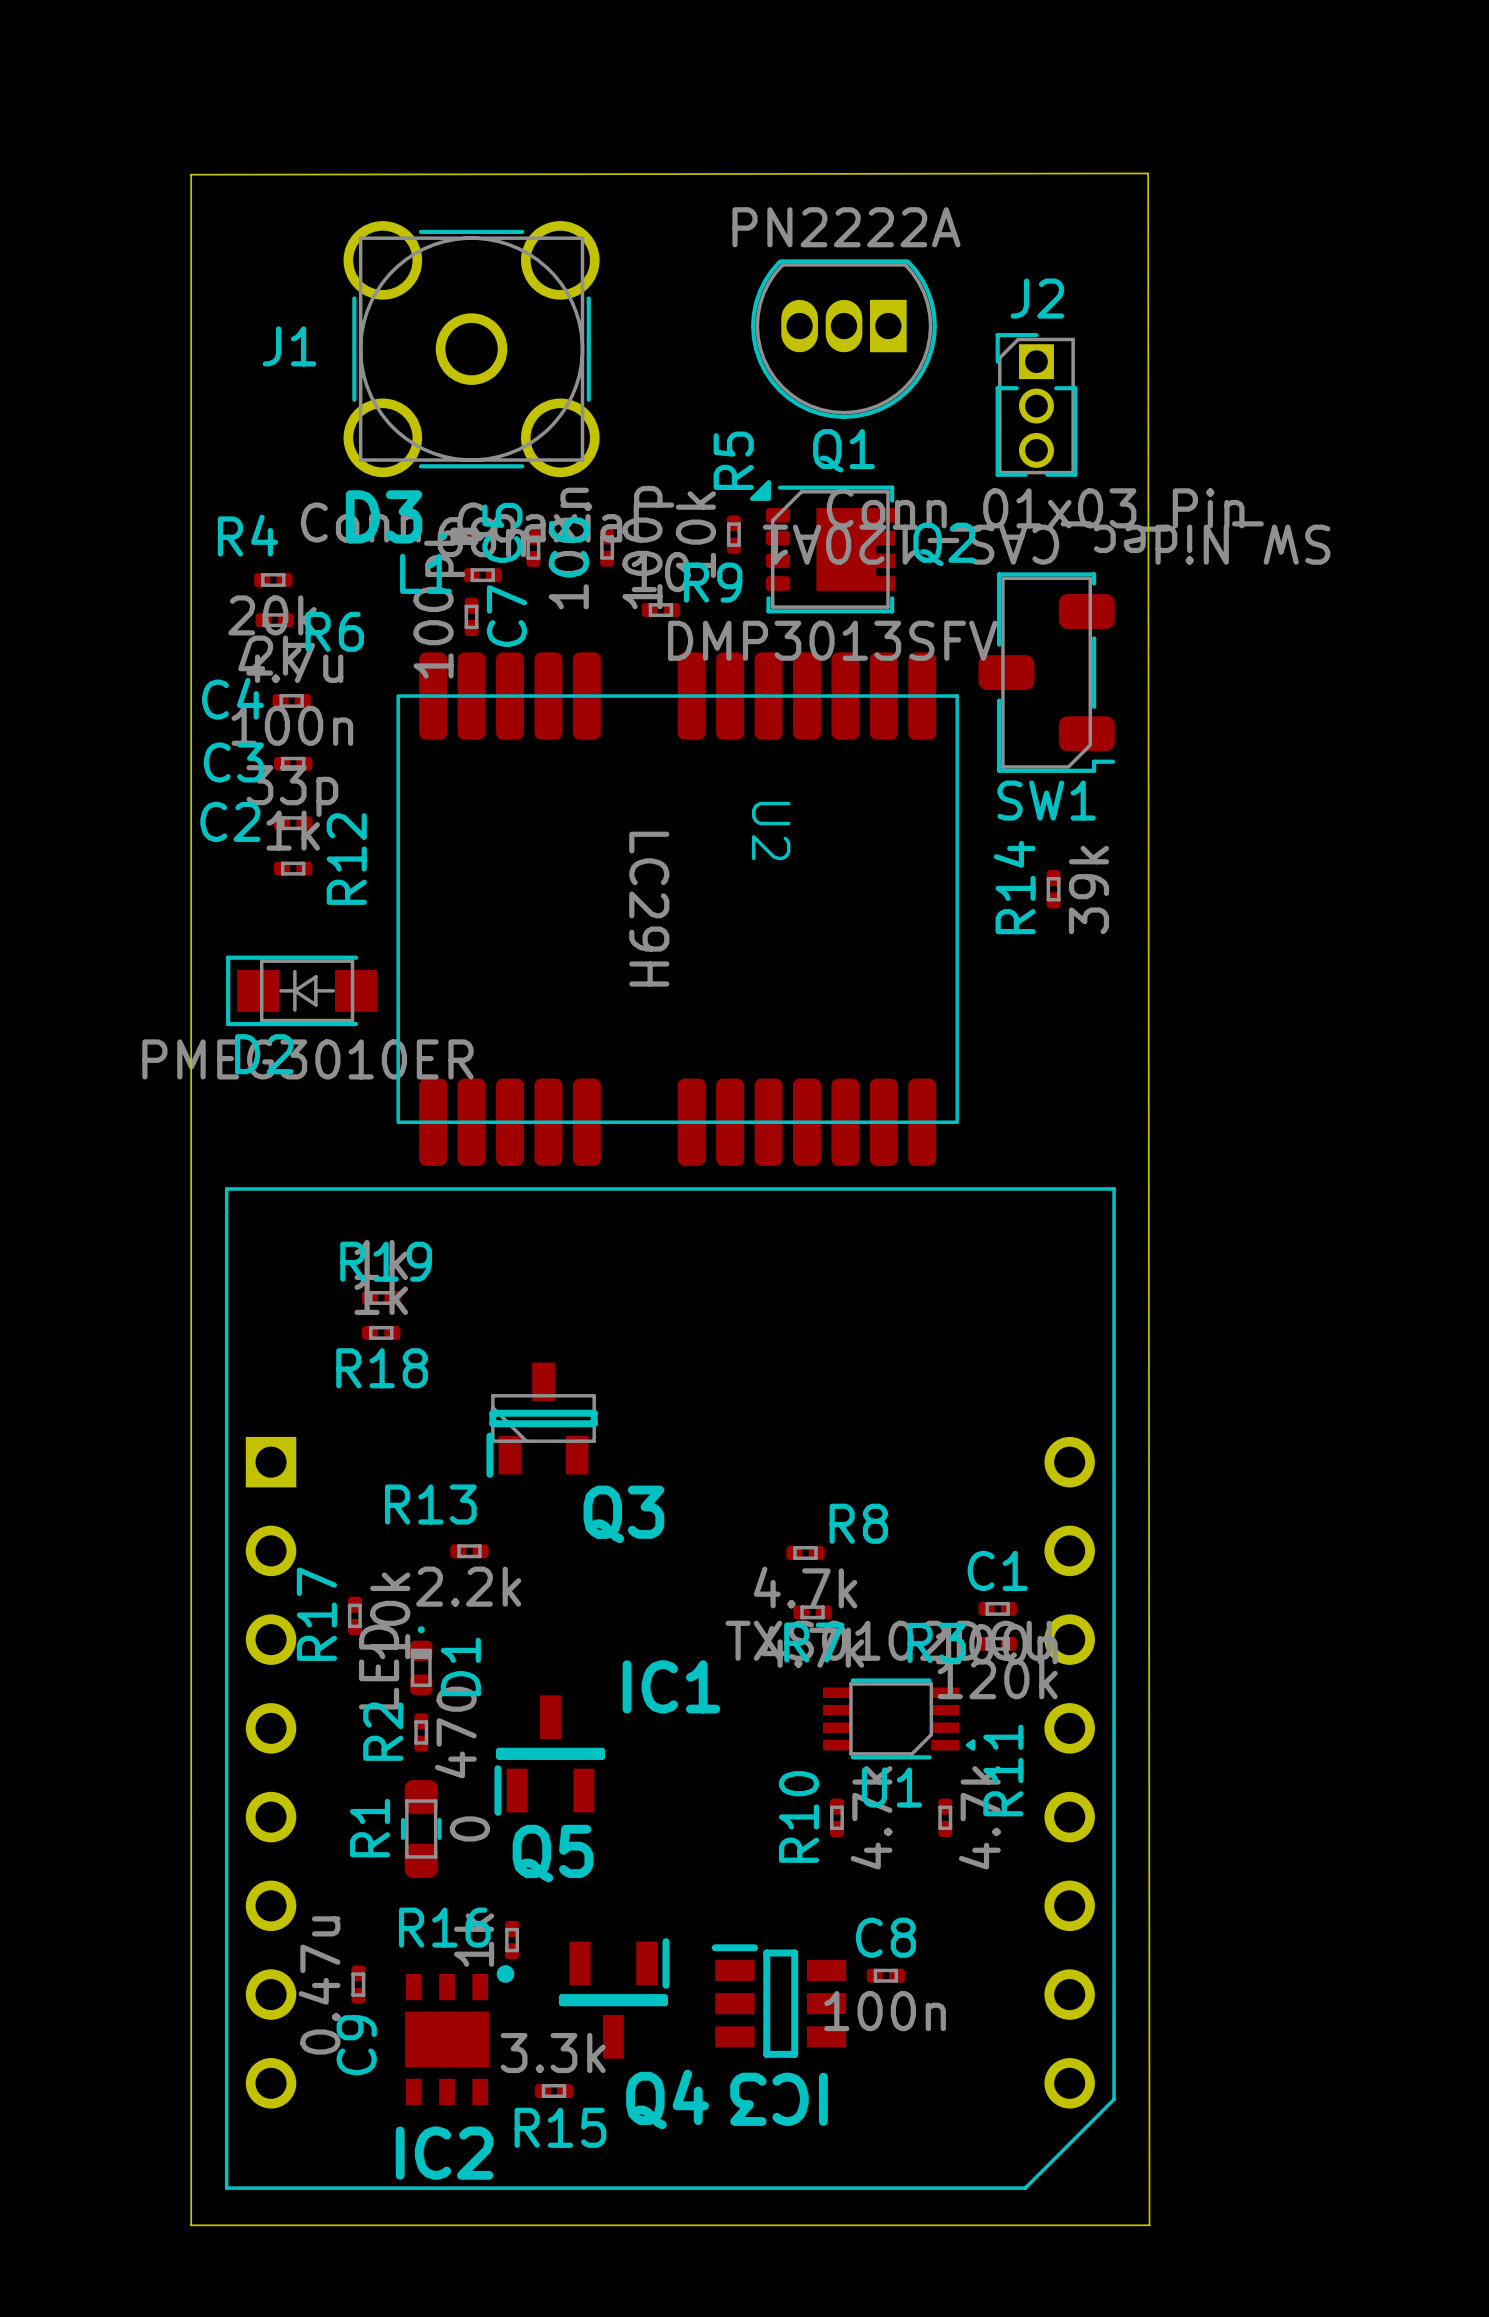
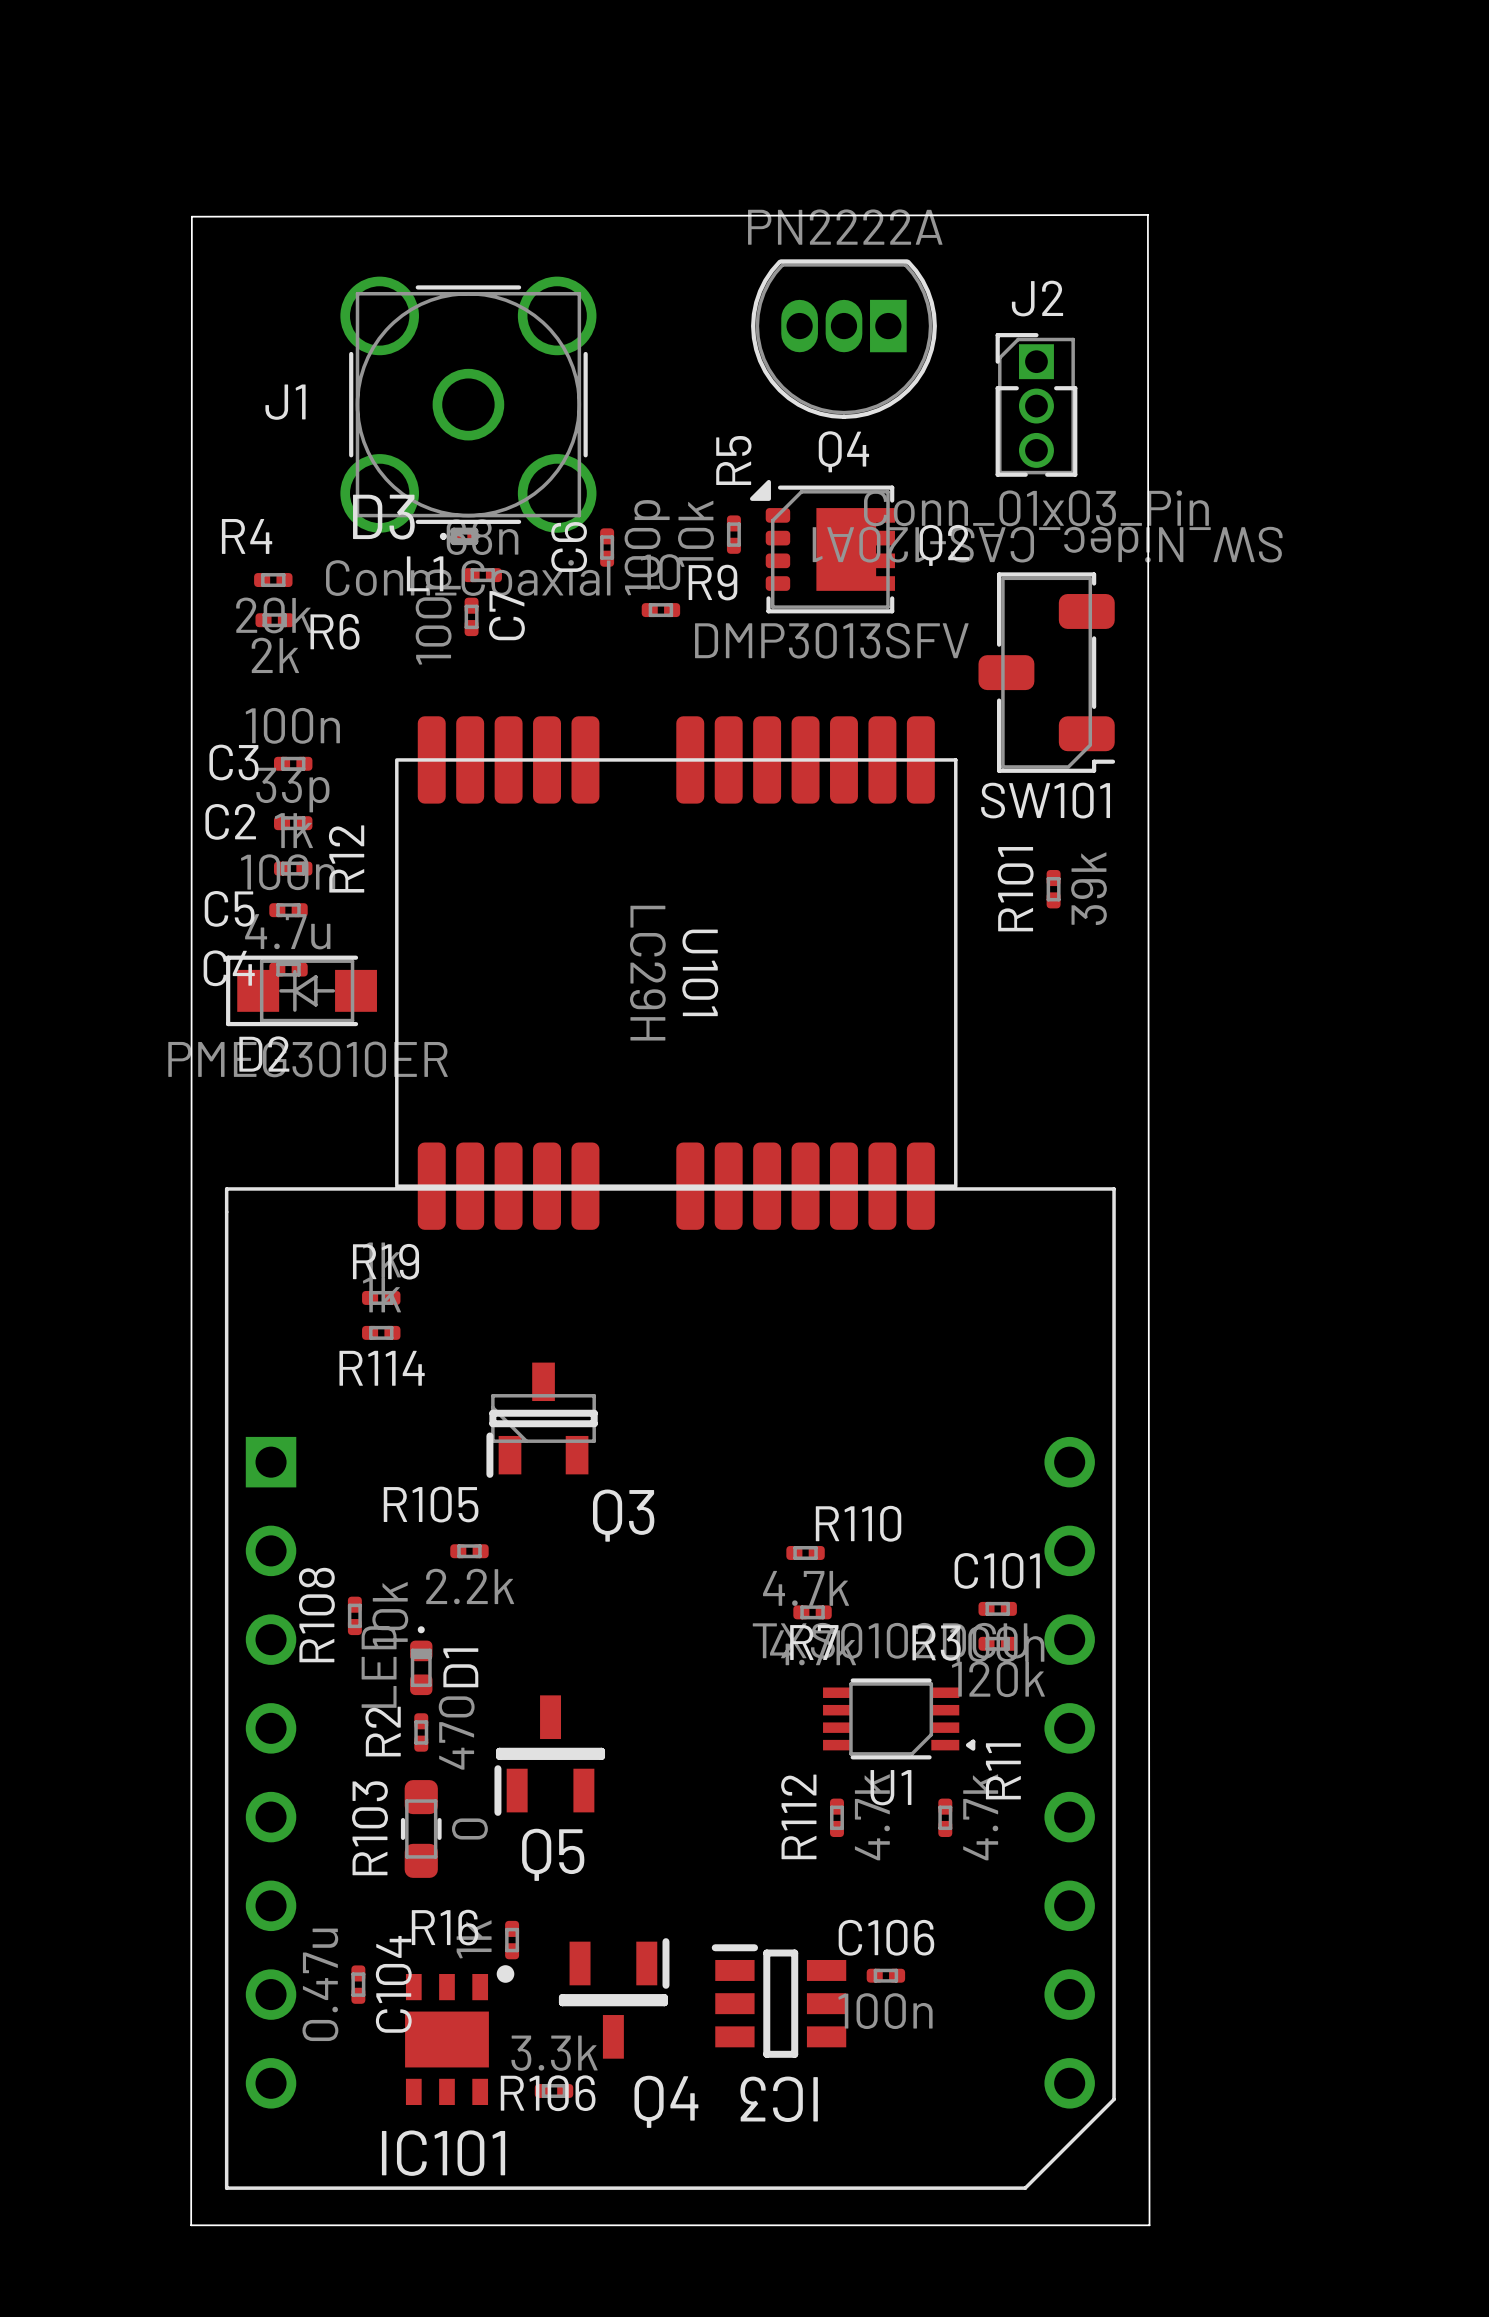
J1 position: (471, 349) -> (468, 404)
Q1 name: Q1 (843, 450) -> Q4 (843, 451)
C5 rotation: 0° (533, 547) -> 90° clockwise (288, 910)
C5 position: (533, 547) -> (288, 910)
C4 position: (291, 700) -> (288, 969)
SW1 name: SW1 (1046, 800) -> SW101 (1045, 800)
R14 name: R14 (1014, 887) -> R101 (1015, 889)
U2: LC29H (677, 909) -> none
U101: none -> LC29H (676, 973)
R18 name: R18 (382, 1368) -> R114 (382, 1368)
R13 name: R13 (430, 1504) -> R105 (431, 1504)
R8 name: R8 (858, 1523) -> R110 (858, 1523)
C1 name: C1 (997, 1570) -> C101 (997, 1570)
R17 name: R17 (316, 1614) -> R108 (316, 1615)
IC1 name: IC1 (671, 1686) -> none
R10 name: R10 (799, 1816) -> R112 (798, 1816)
R1 name: R1 (369, 1828) -> R103 (370, 1828)
C8 name: C8 (885, 1937) -> C106 (886, 1937)
C9 name: C9 (356, 2045) -> C104 (393, 1984)
R15 name: R15 (560, 2127) -> R106 (548, 2093)
IC2 name: IC2 (444, 2153) -> IC101 (443, 2153)
board edge: (191, 2225) (191, 174) (1148, 173) (1149, 2225) -> (191, 2225) (191, 216) (1147, 214) (1149, 2225)

